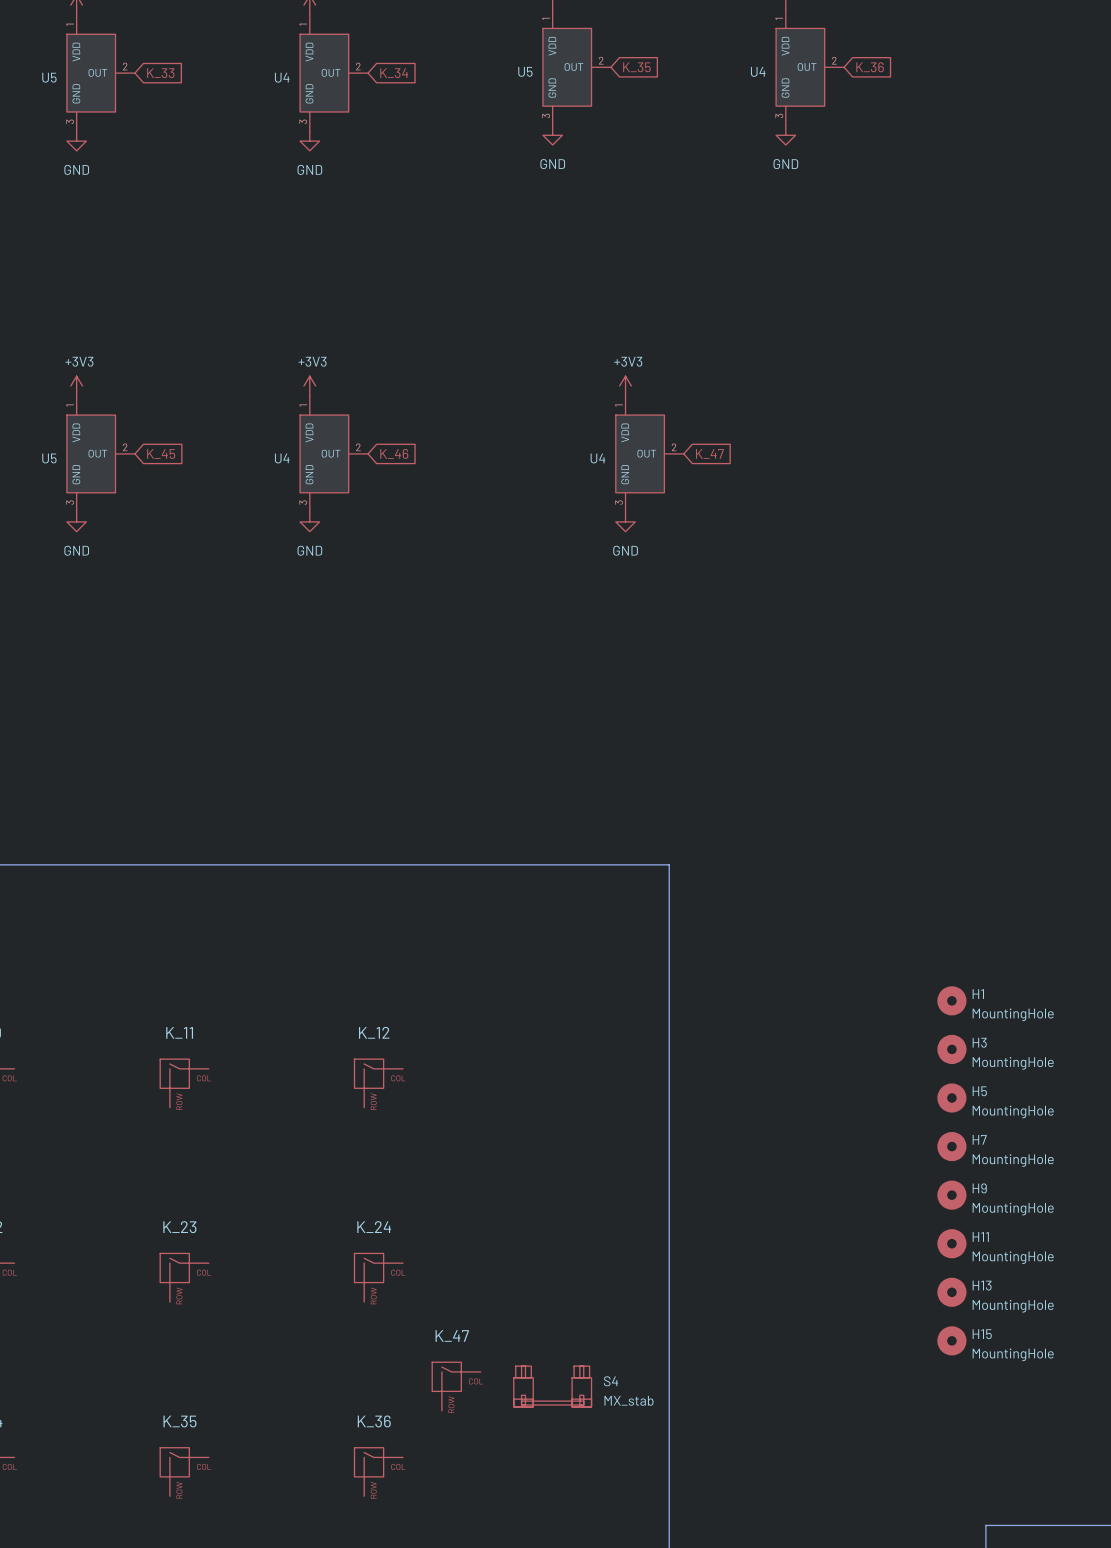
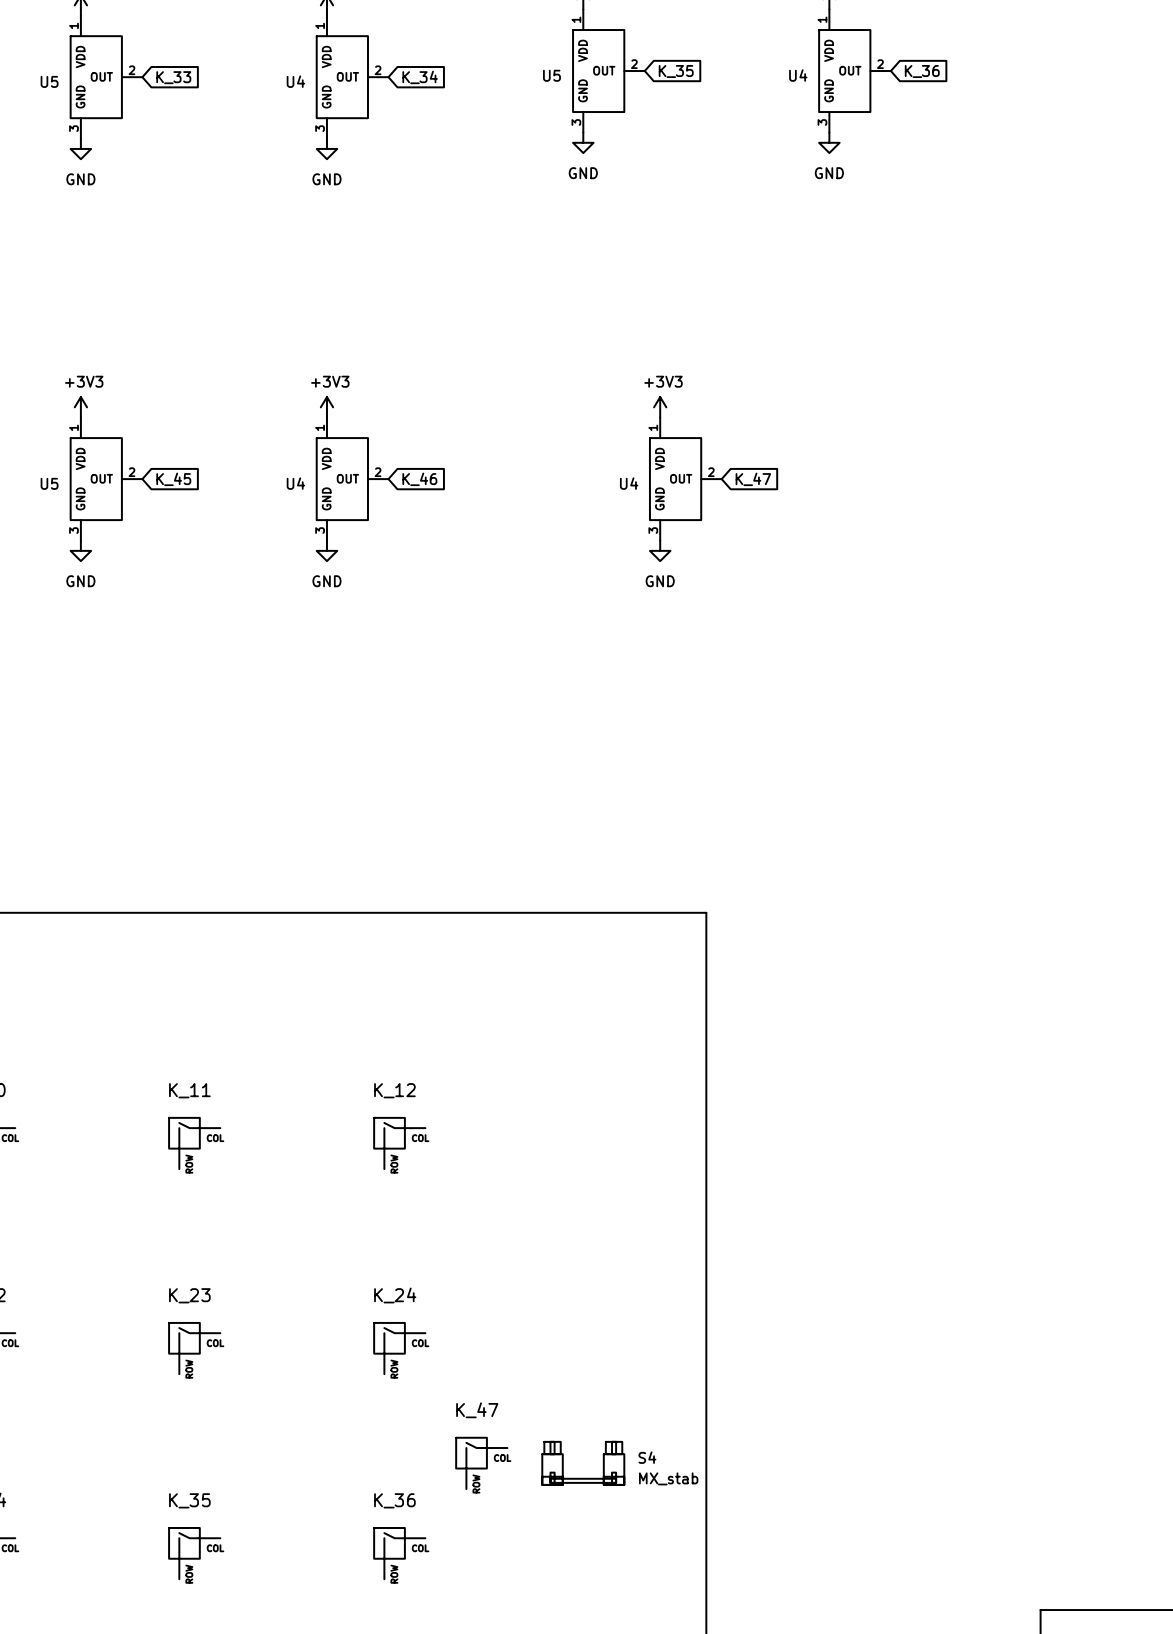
H1: MountingHole (951, 1000) -> none
H3: MountingHole (951, 1049) -> none
H5: MountingHole (951, 1098) -> none
H7: MountingHole (951, 1146) -> none
H9: MountingHole (951, 1195) -> none
H11: MountingHole (951, 1243) -> none
H13: MountingHole (951, 1292) -> none
H15: MountingHole (951, 1340) -> none

